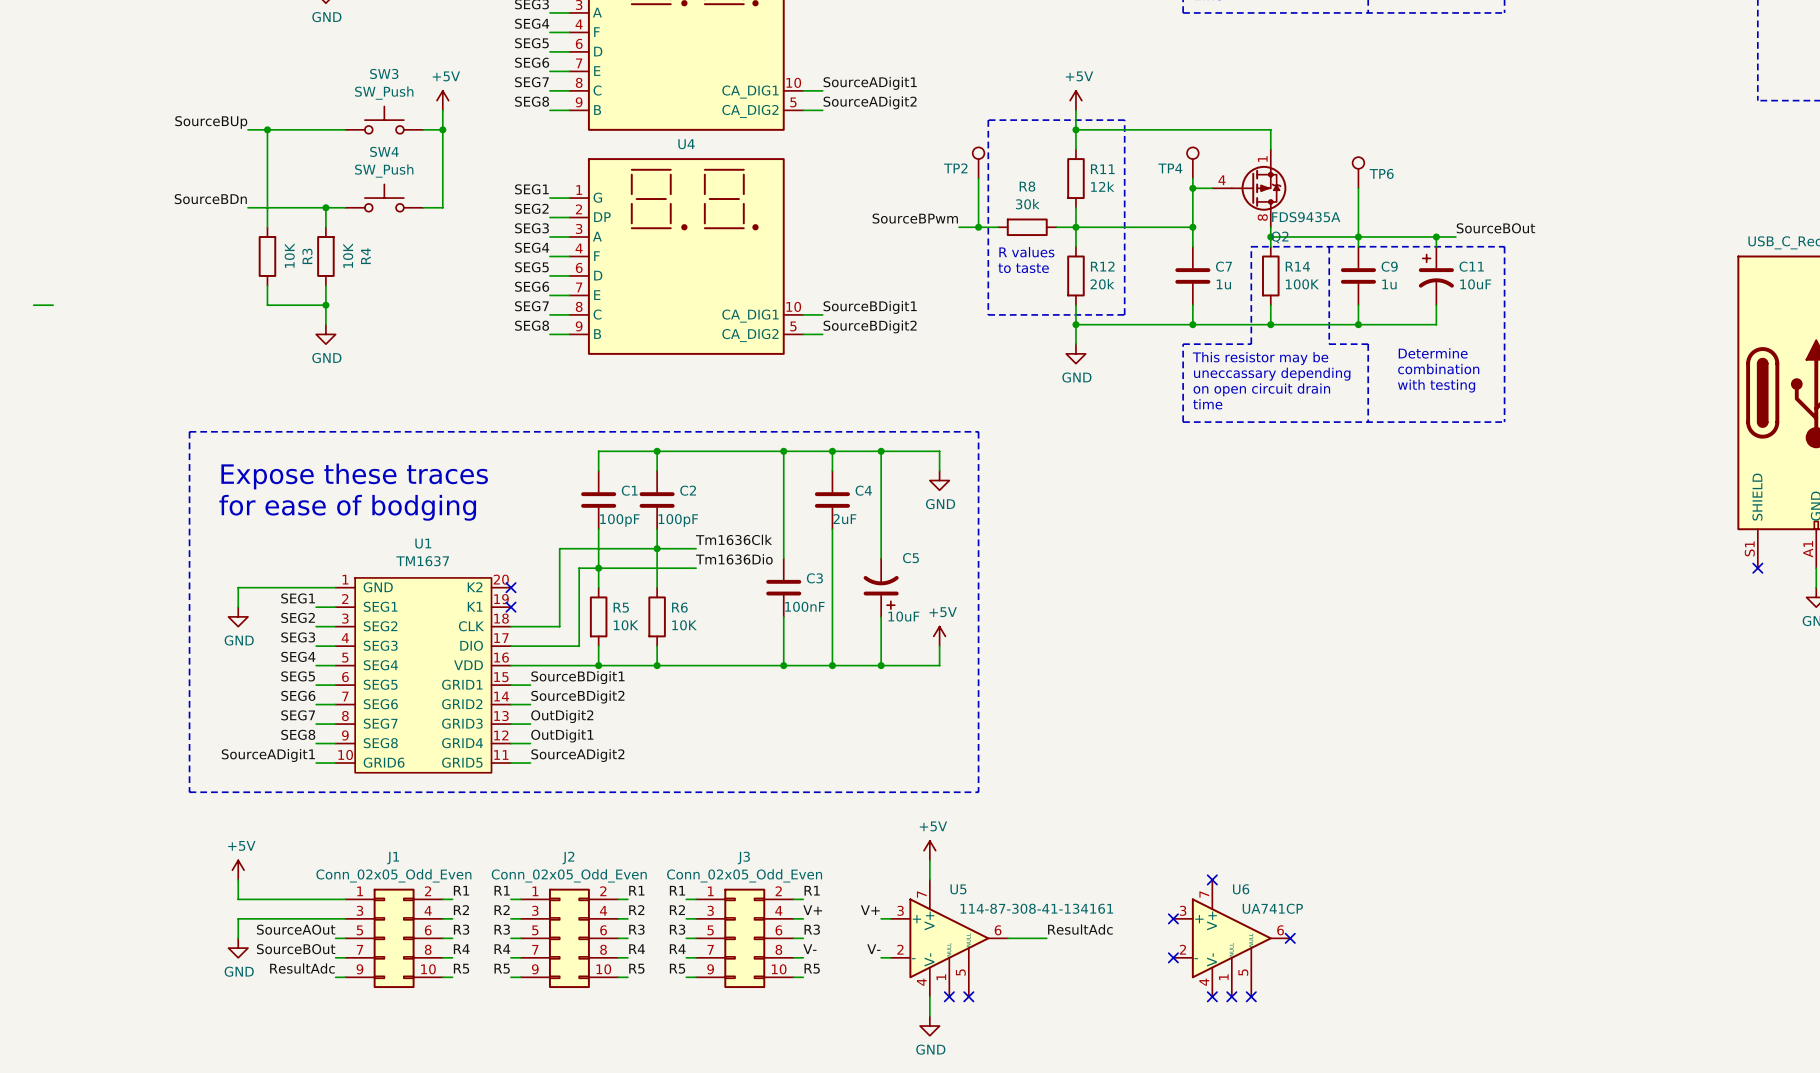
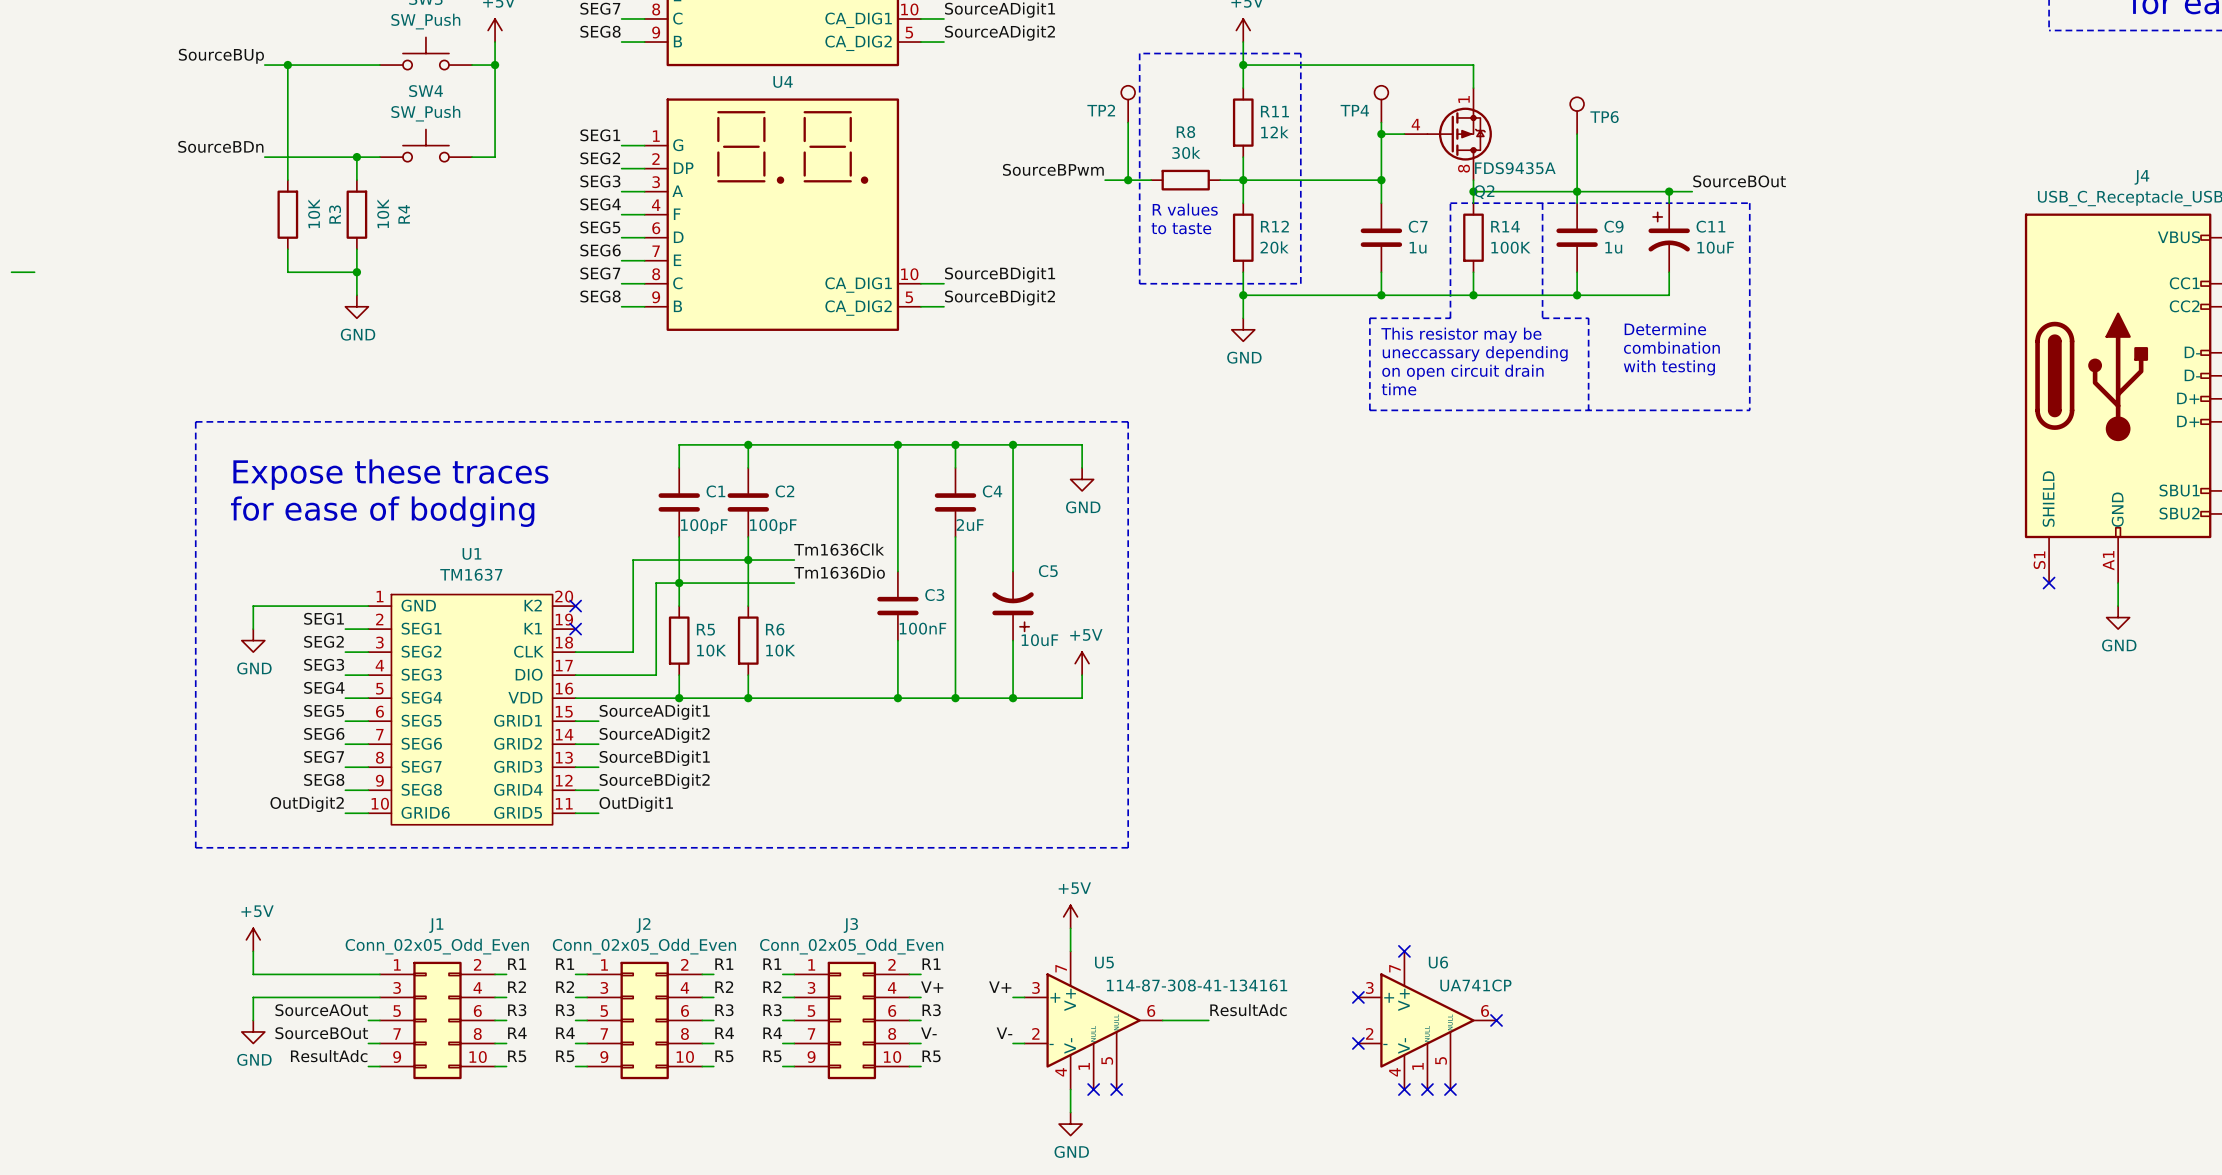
label: SourceBDigit1 (577, 677) -> SourceADigit1 (654, 712)
label: SourceBDigit2 (577, 697) -> SourceADigit2 (654, 735)
label: OutDigit2 (562, 716) -> SourceBDigit1 (654, 758)
label: OutDigit1 (562, 736) -> SourceBDigit2 (654, 781)
label: SourceADigit1 (268, 755) -> OutDigit2 (307, 804)
label: SourceADigit2 (577, 755) -> OutDigit1 (636, 804)

